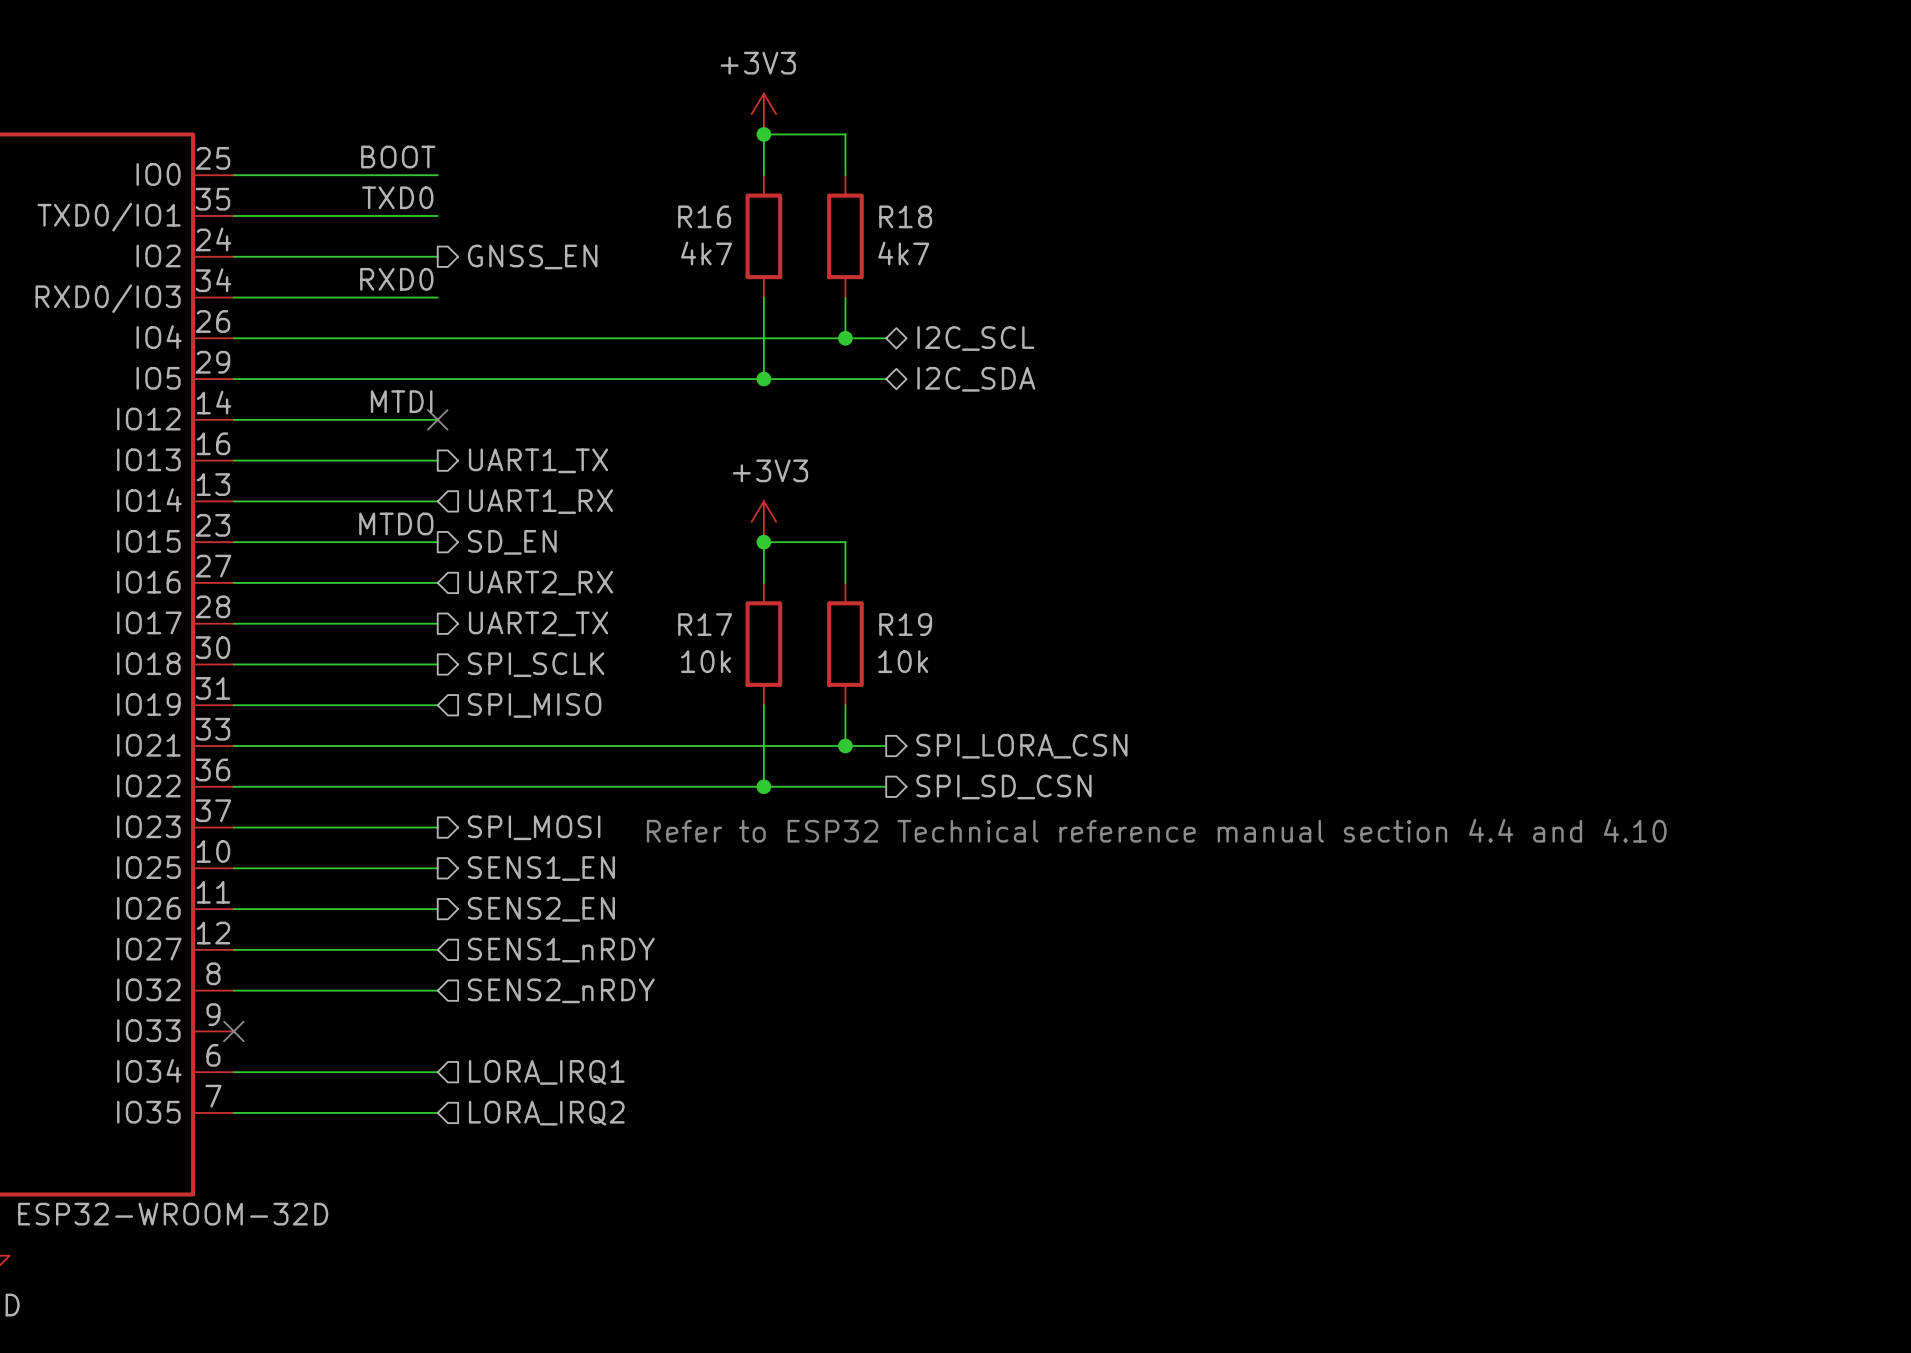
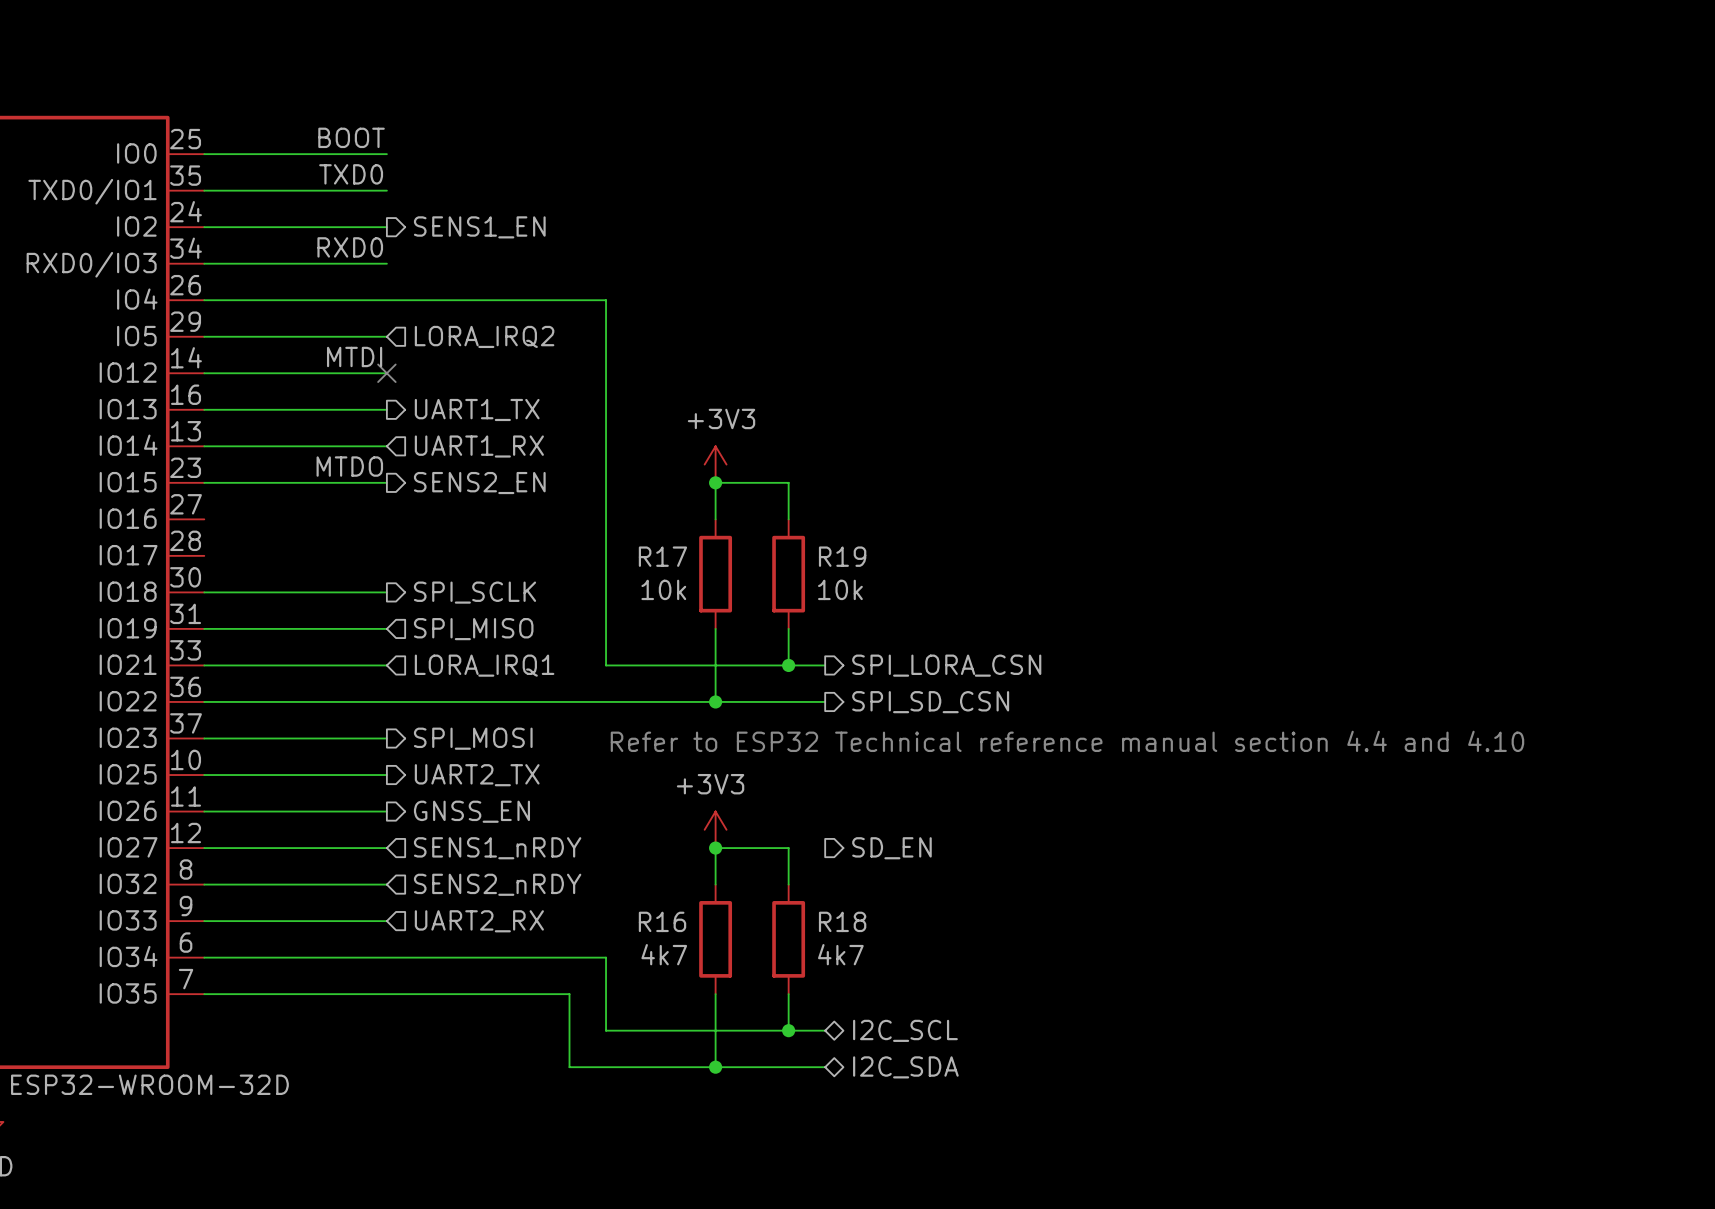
power symbol: +3V3 (763, 114) -> none
junction: (763, 134) -> none
wire: (763, 175) (763, 134) (845, 134) (845, 175) -> none
R16 position: (763, 236) -> (715, 939)
R18 position: (845, 236) -> (788, 939)
hierarchical label: GNSS_EN (532, 256) -> SENS1_EN (479, 227)
wire: (763, 297) (763, 379) -> none
wire: (845, 297) (845, 338) -> none
wire: (682, 338) (886, 338) -> (606, 300) (606, 665)
junction: (845, 338) -> none
hierarchical label: I2C_SCL (975, 338) -> none
wire: (437, 379) (886, 379) -> none
hierarchical label: none -> LORA_IRQ2 (484, 336)
junction: (763, 379) -> none
hierarchical label: I2C_SDA (976, 379) -> none
power symbol position: +3V3 (763, 521) -> +3V3 (715, 464)
hierarchical label: SD_EN (512, 542) -> SENS2_EN (479, 483)
junction position: (763, 542) -> (715, 482)
wire: (804, 542) (763, 542) (763, 582) -> (715, 482) (715, 519)
wire: (845, 542) (845, 582) -> (752, 482) (788, 482) (788, 519)
wire: (233, 582) (437, 582) -> none
hierarchical label: UART2_RX (540, 583) -> none
wire: (233, 623) (437, 623) -> none
hierarchical label: UART2_TX (538, 623) -> none
R17 position: (763, 644) -> (715, 574)
R19 position: (845, 644) -> (788, 574)
wire: (763, 705) (763, 786) -> (715, 628) (715, 701)
wire: (845, 705) (845, 746) -> none
wire: none -> (788, 628) (788, 665) (825, 665)
wire: (437, 746) (682, 746) -> none
junction: (845, 746) -> none
junction: none -> (788, 665)
hierarchical label position: SPI_LORA_CSN (1021, 746) -> SPI_LORA_CSN (946, 665)
junction: (763, 786) -> none
junction: none -> (715, 701)
wire: none -> (788, 701) (825, 701)
hierarchical label position: SPI_SD_CSN (1003, 786) -> SPI_SD_CSN (930, 702)
text position: Refer to ESP32 Technical reference manual section 4.4 and 4.10 (1156, 830) -> Refer to ESP32 Technical reference manual section 4.4 and 4.10 (1067, 741)
hierarchical label: SENS1_EN (541, 868) -> UART2_TX (477, 775)
hierarchical label: SENS2_EN (541, 909) -> GNSS_EN (471, 811)
power symbol: none -> +3V3 (715, 829)
junction: none -> (715, 848)
hierarchical label: none -> SD_EN (891, 848)
wire: none -> (715, 884) (715, 848) (788, 848) (788, 884)
wire: none -> (204, 921) (386, 921)
no-connect mark: (233, 1031) -> none
hierarchical label: none -> UART2_RX (479, 921)
wire: none -> (386, 957) (606, 957) (606, 1030) (825, 1030)
hierarchical label position: LORA_IRQ1 (546, 1072) -> LORA_IRQ1 (484, 665)
wire: none -> (386, 994) (569, 994) (569, 1067) (825, 1067)
wire: none -> (715, 994) (715, 1067)
wire: none -> (788, 994) (788, 1030)
hierarchical label: LORA_IRQ2 (546, 1113) -> none
junction: none -> (788, 1030)
hierarchical label: none -> I2C_SCL (905, 1030)
junction: none -> (715, 1067)
hierarchical label: none -> I2C_SDA (905, 1067)

